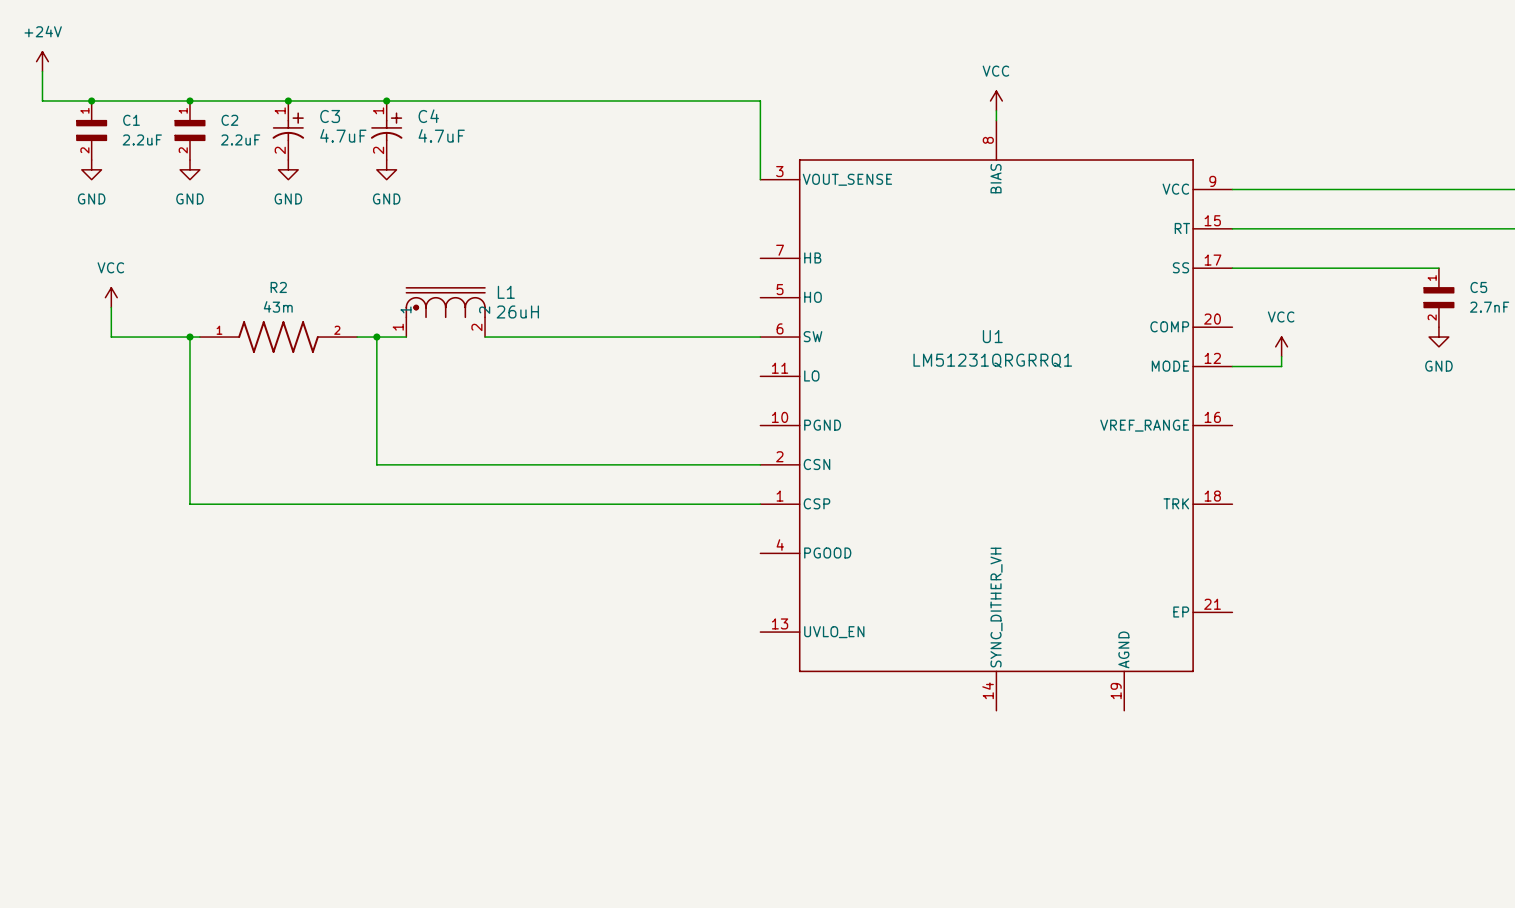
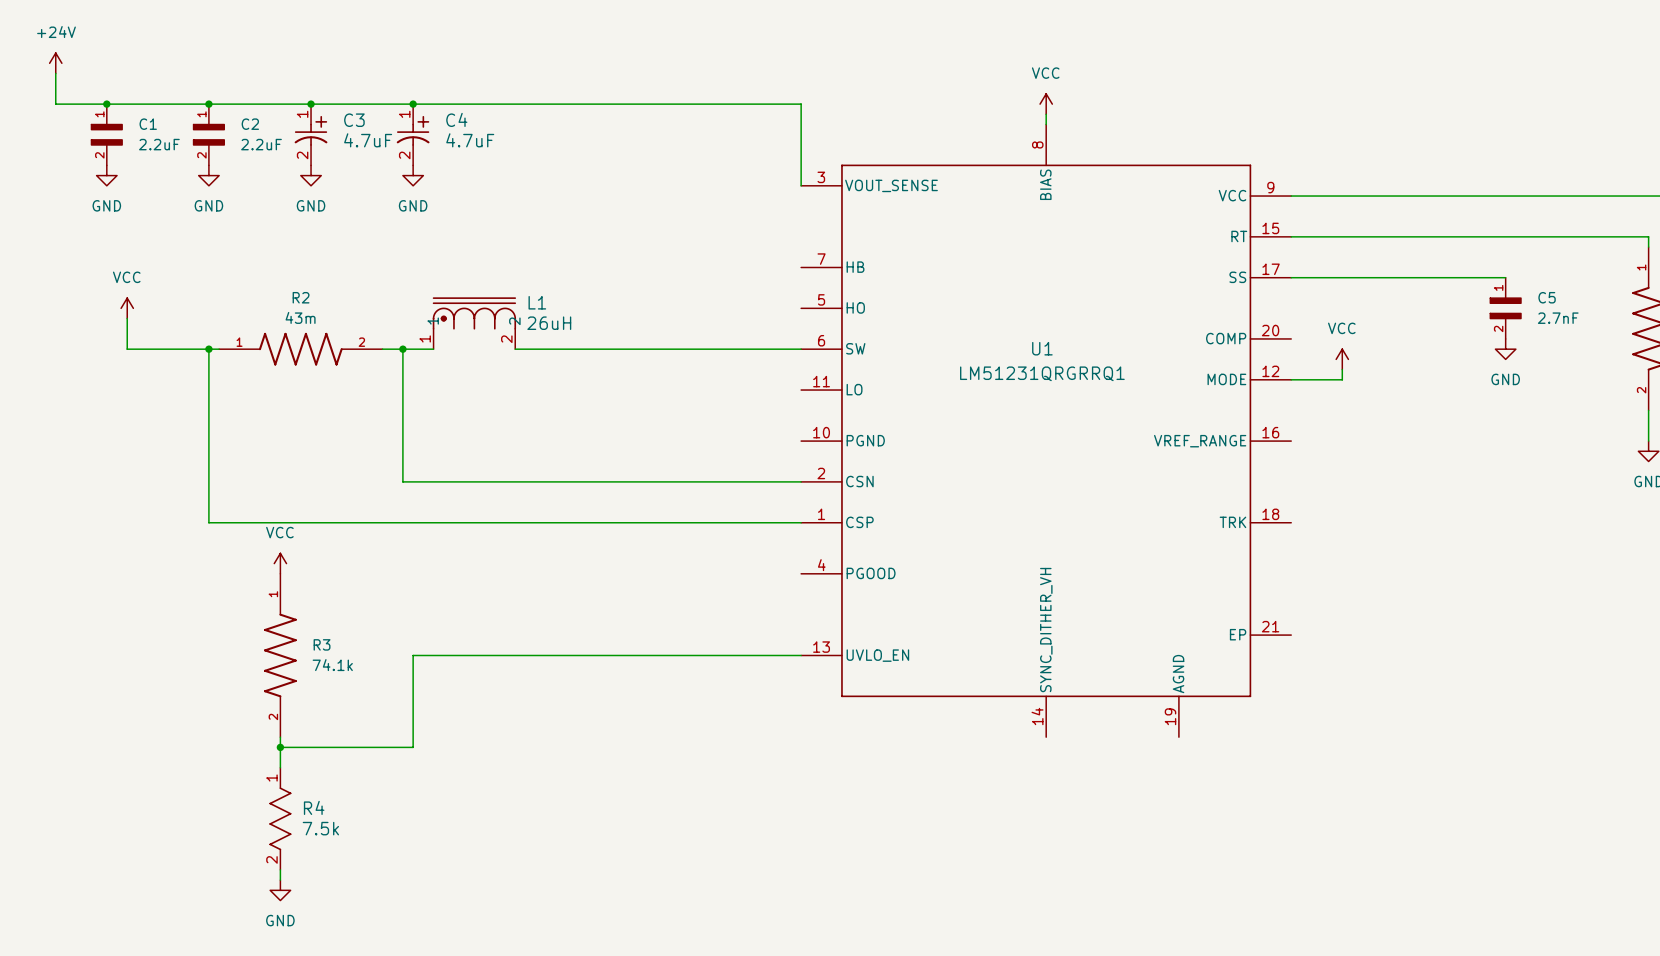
power symbol: none -> VCC (280, 563)
R3: none -> 74.1k (280, 655)
wire: none -> (801, 655) (413, 655) (413, 747) (280, 747)
wire: none -> (280, 737) (280, 767)
junction: none -> (280, 747)
R4: none -> 7.5k (280, 818)
wire: none -> (280, 869) (280, 880)
power symbol: none -> GND (280, 890)

